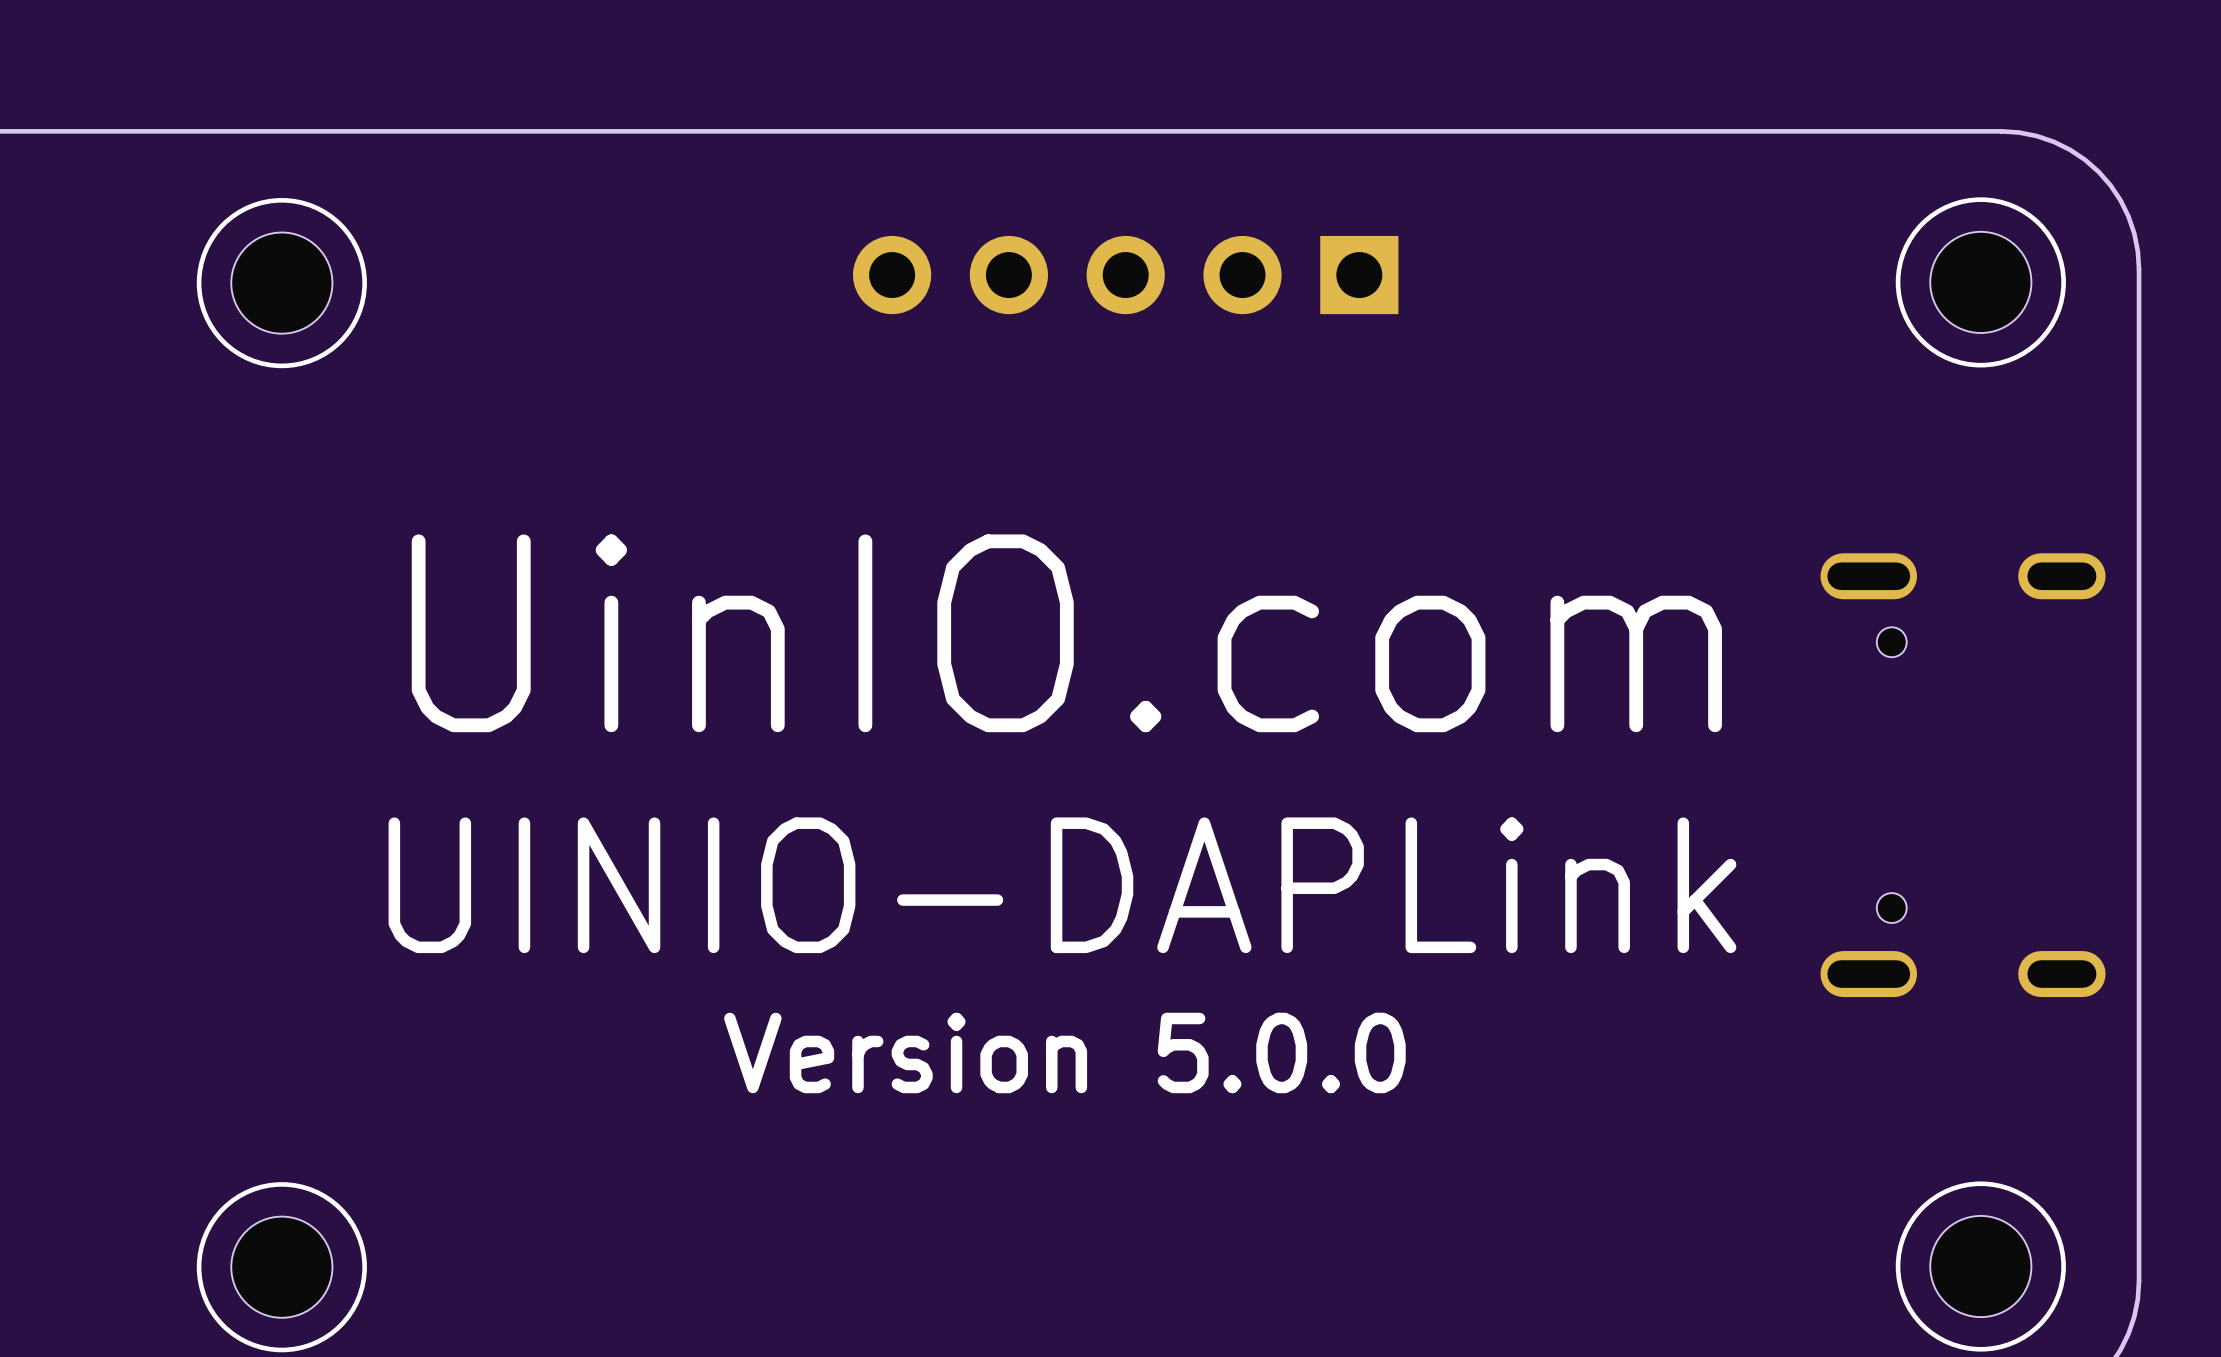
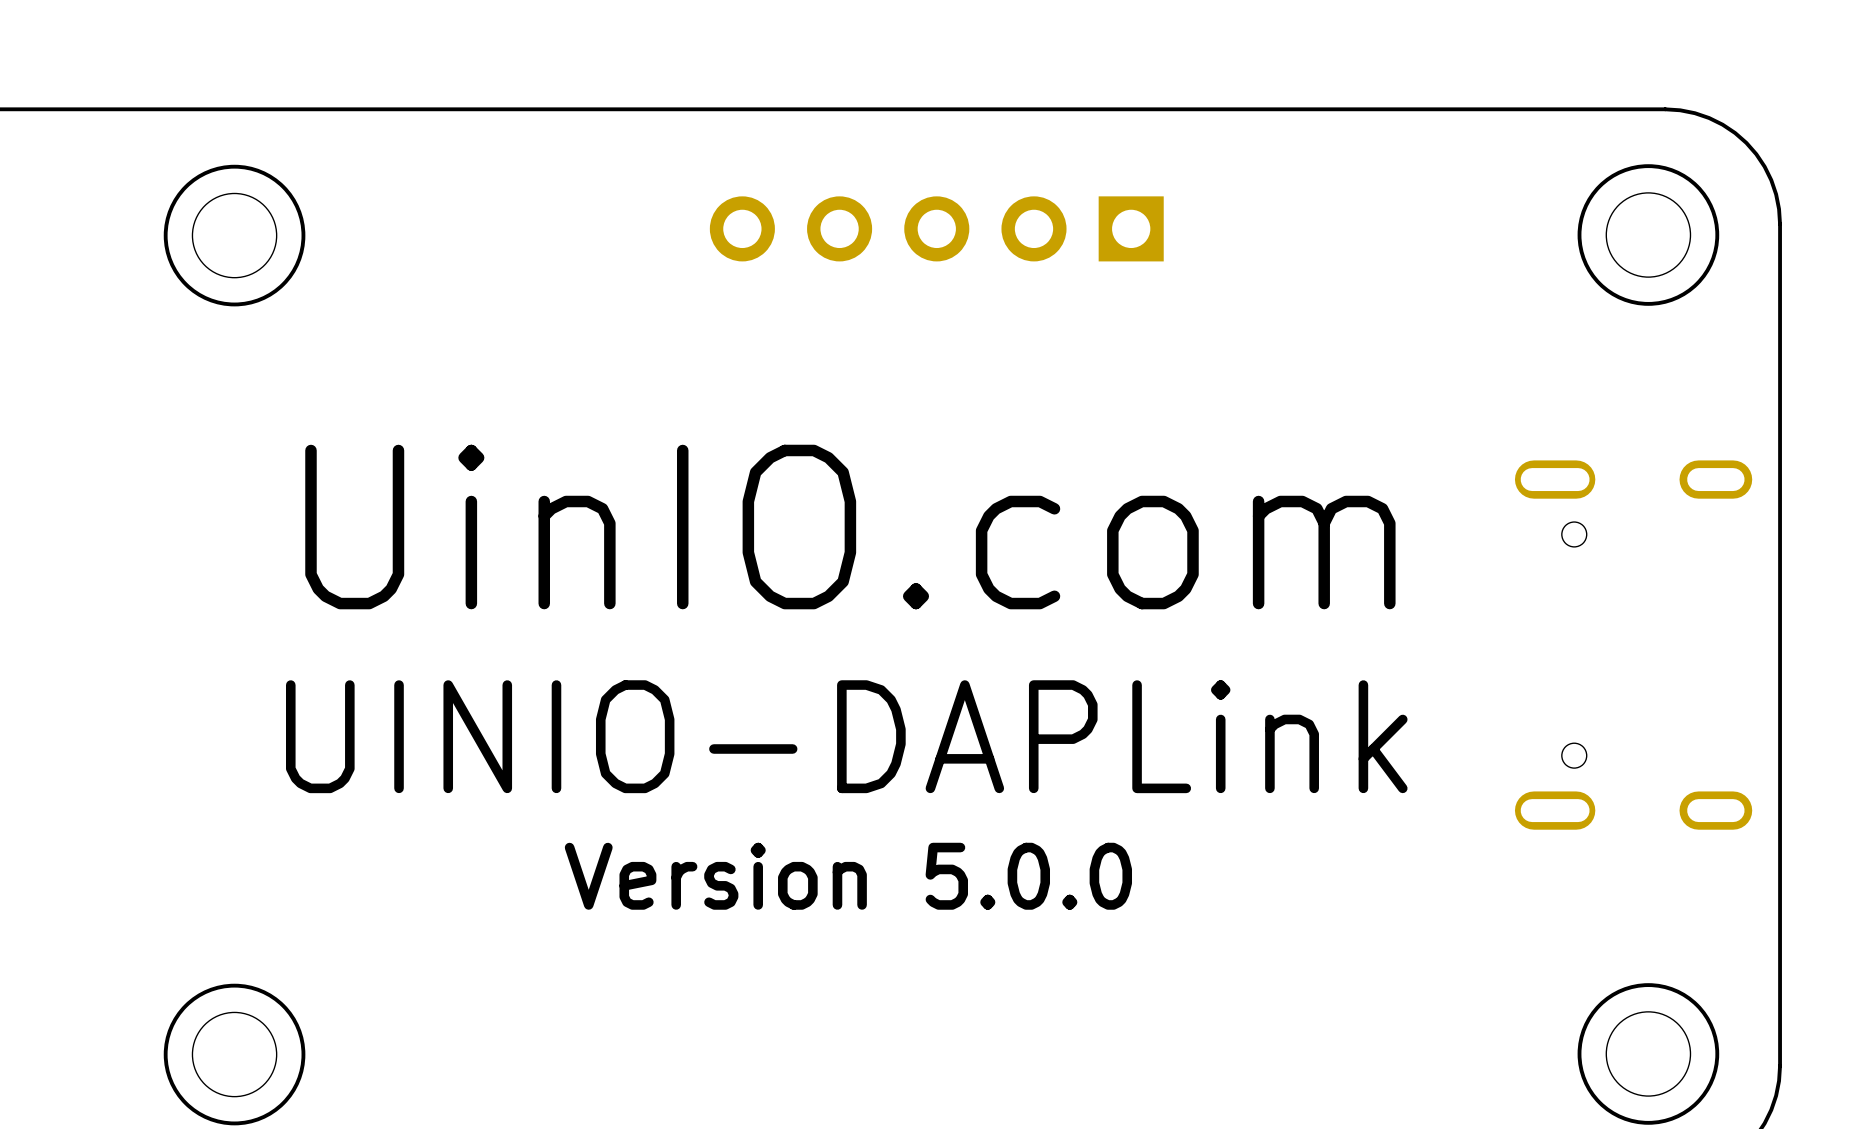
text position: UinIO.com (1066, 633) -> UinIO.com (850, 527)
text position: UINIO-DAPLink (1062, 885) -> UINIO-DAPLink (846, 736)
text position: Version 5.0.0 (1064, 1052) -> Version 5.0.0 (848, 876)

